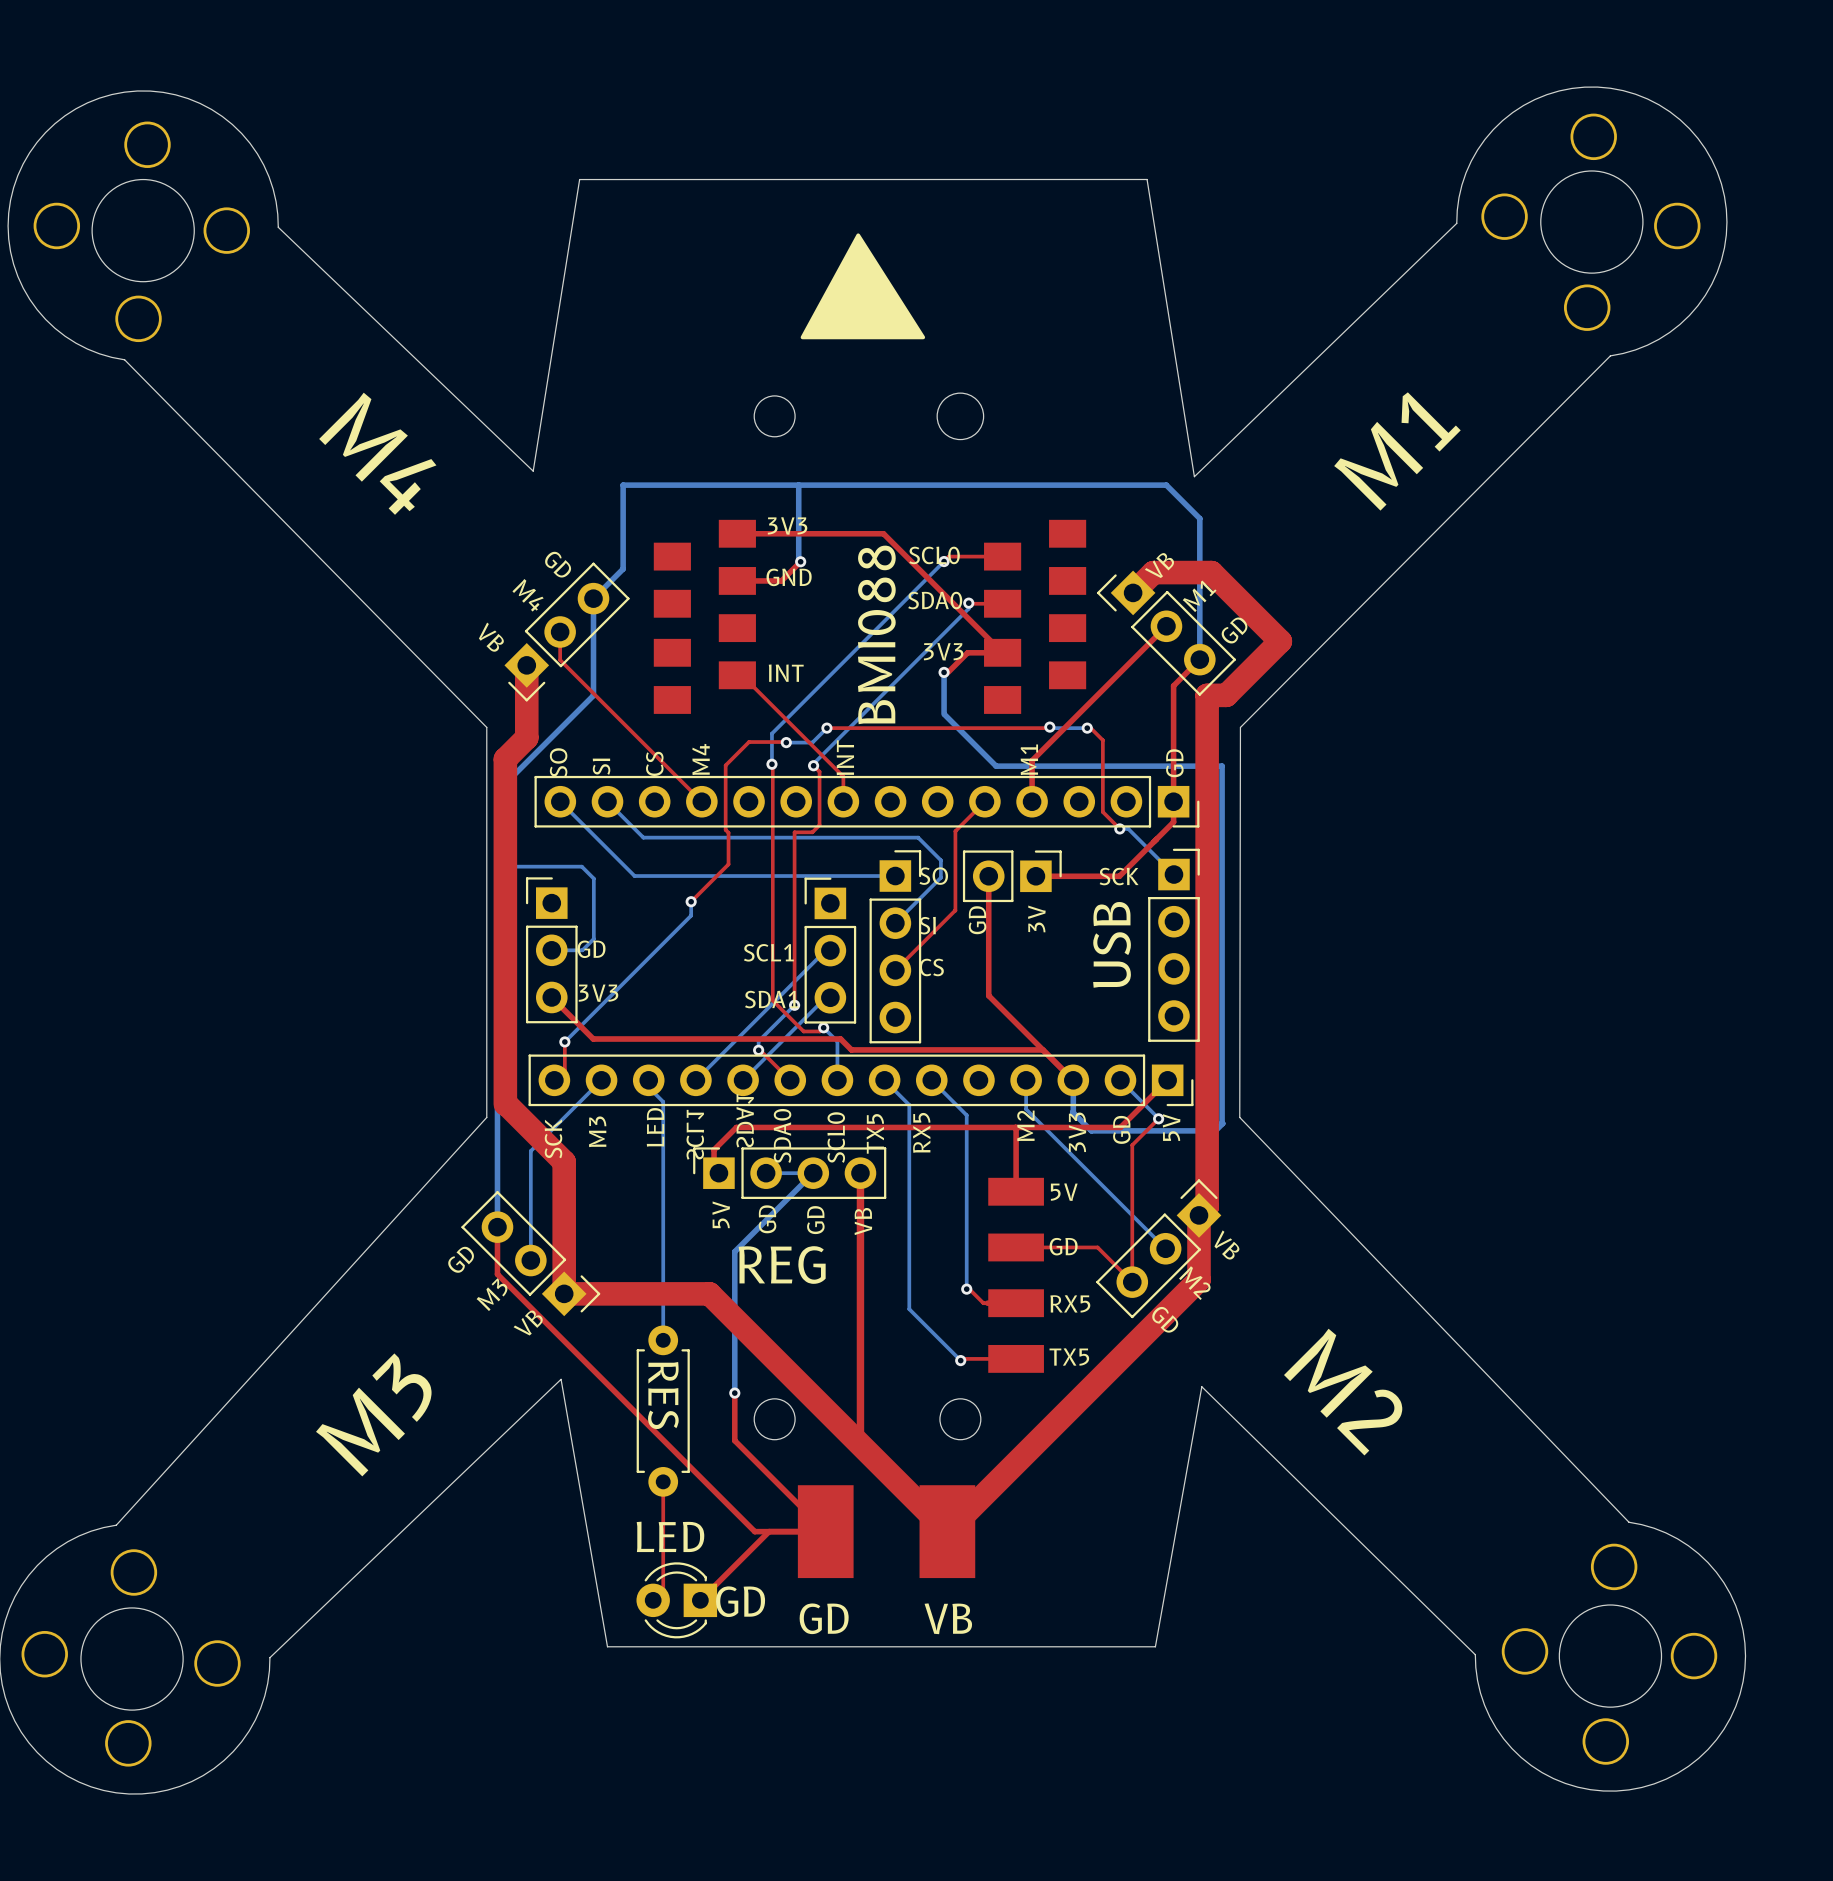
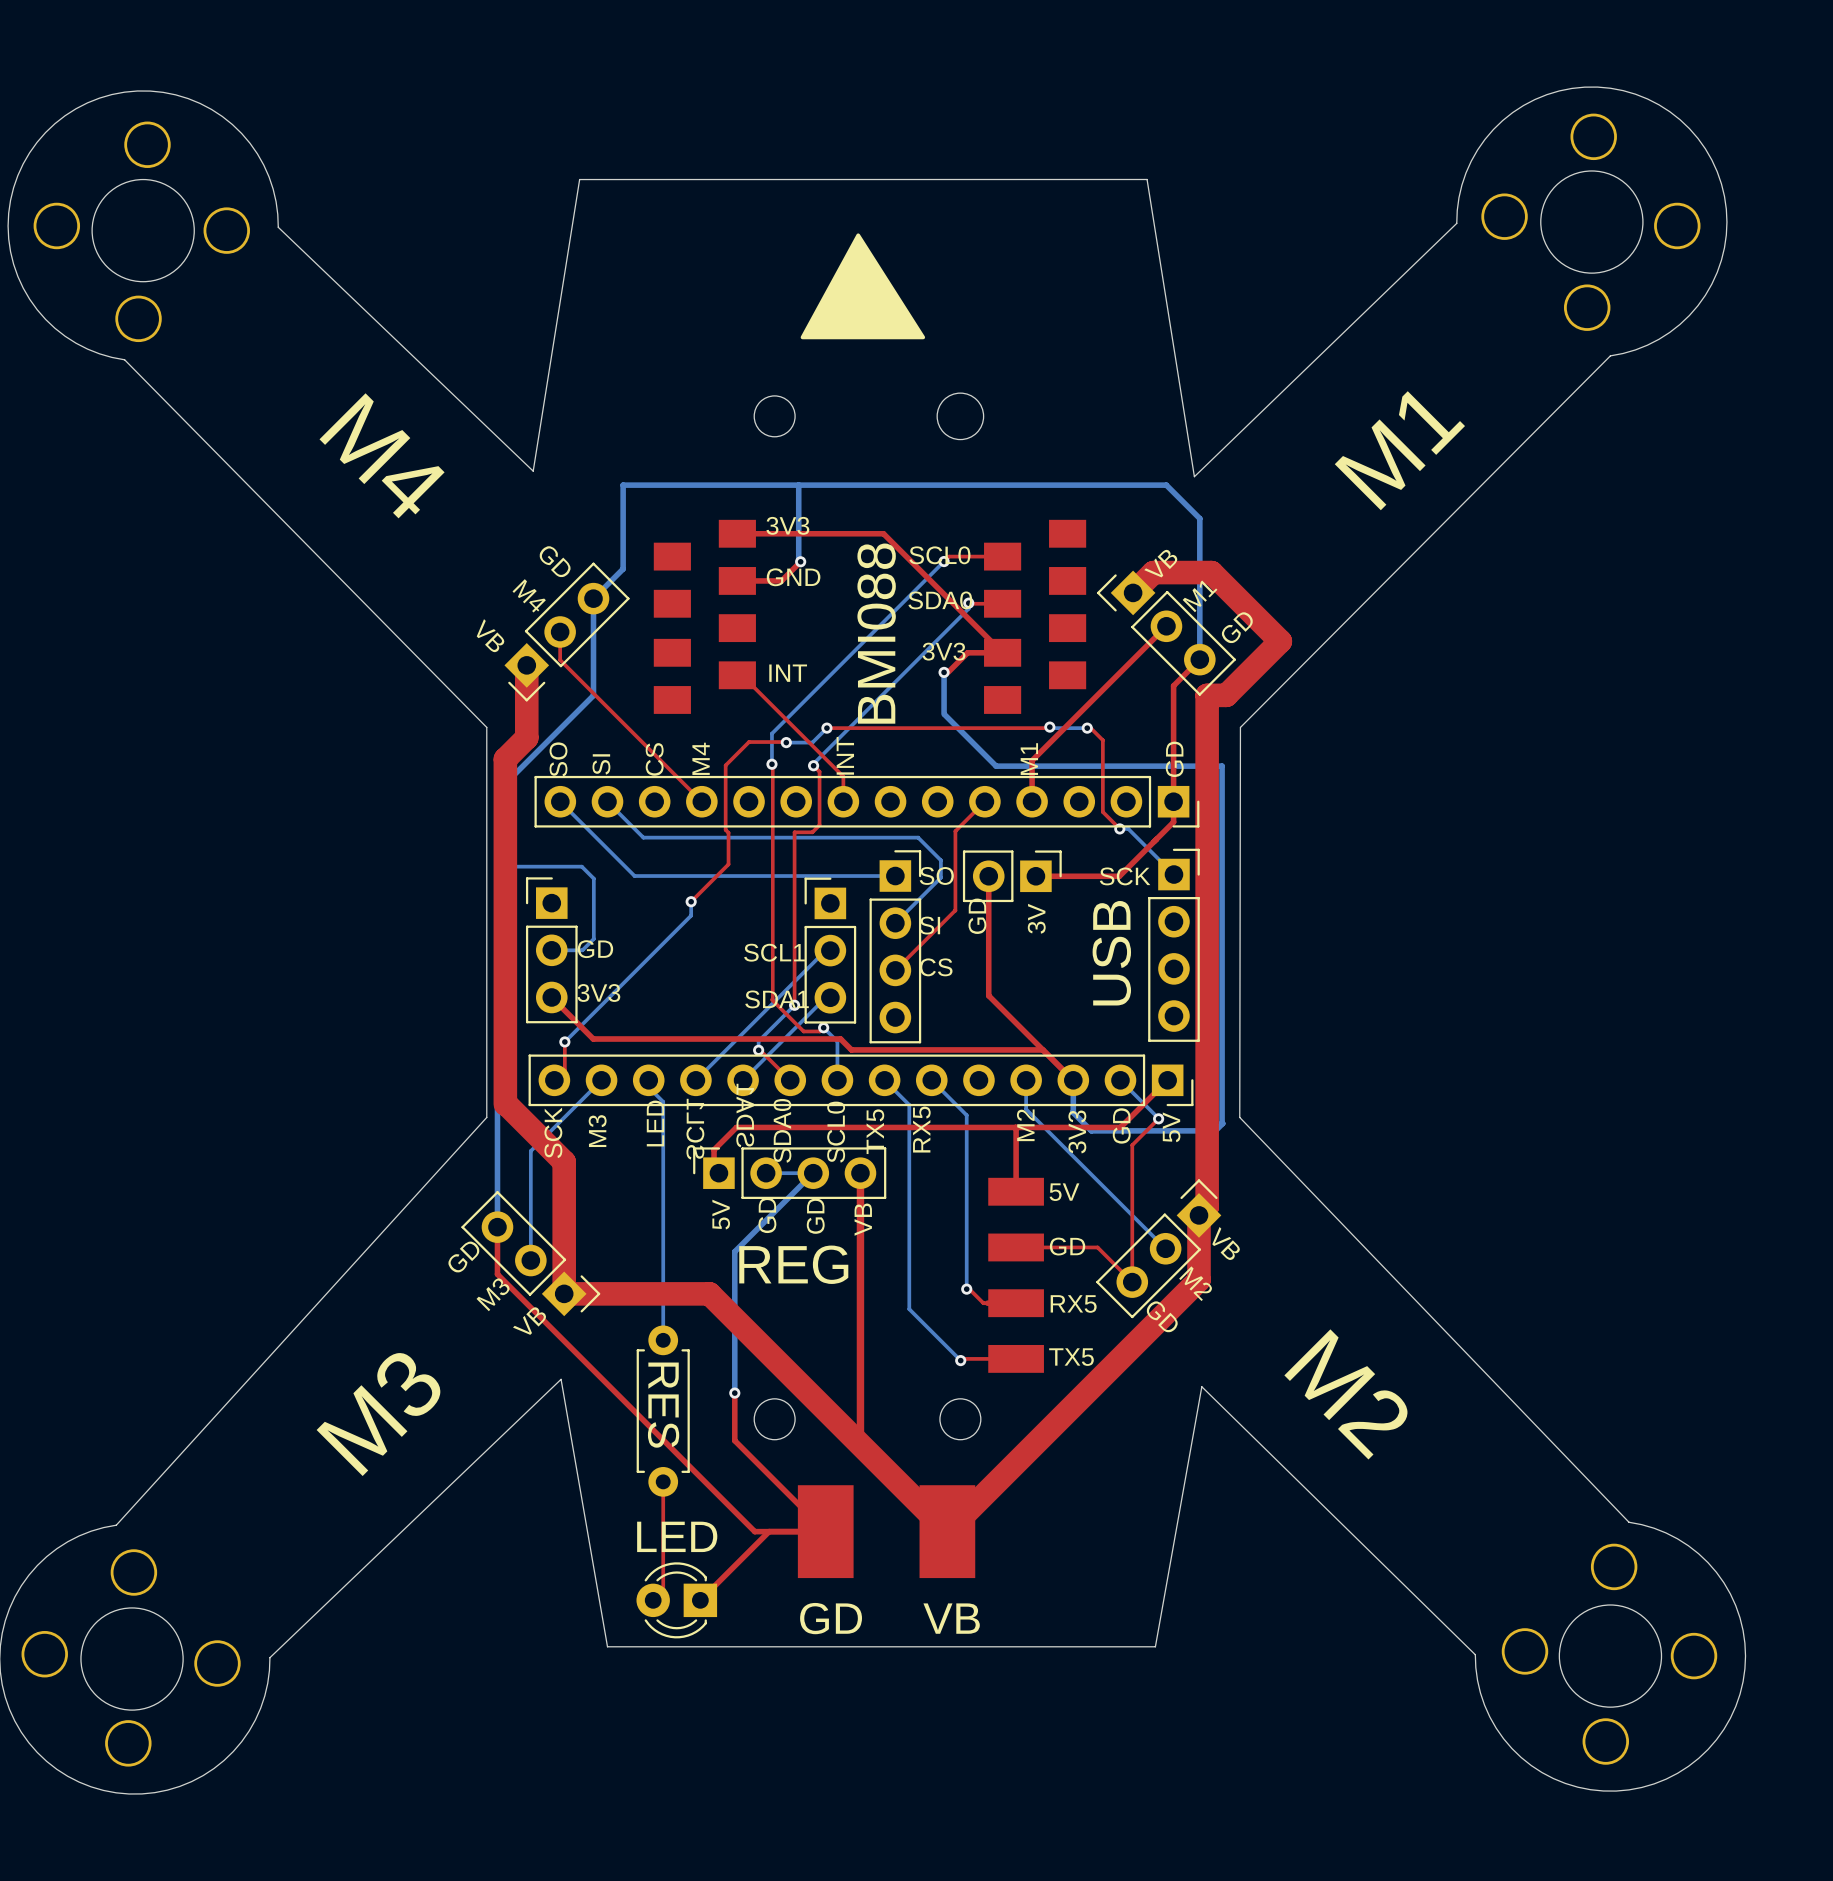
text: GD (740, 1601) -> none

